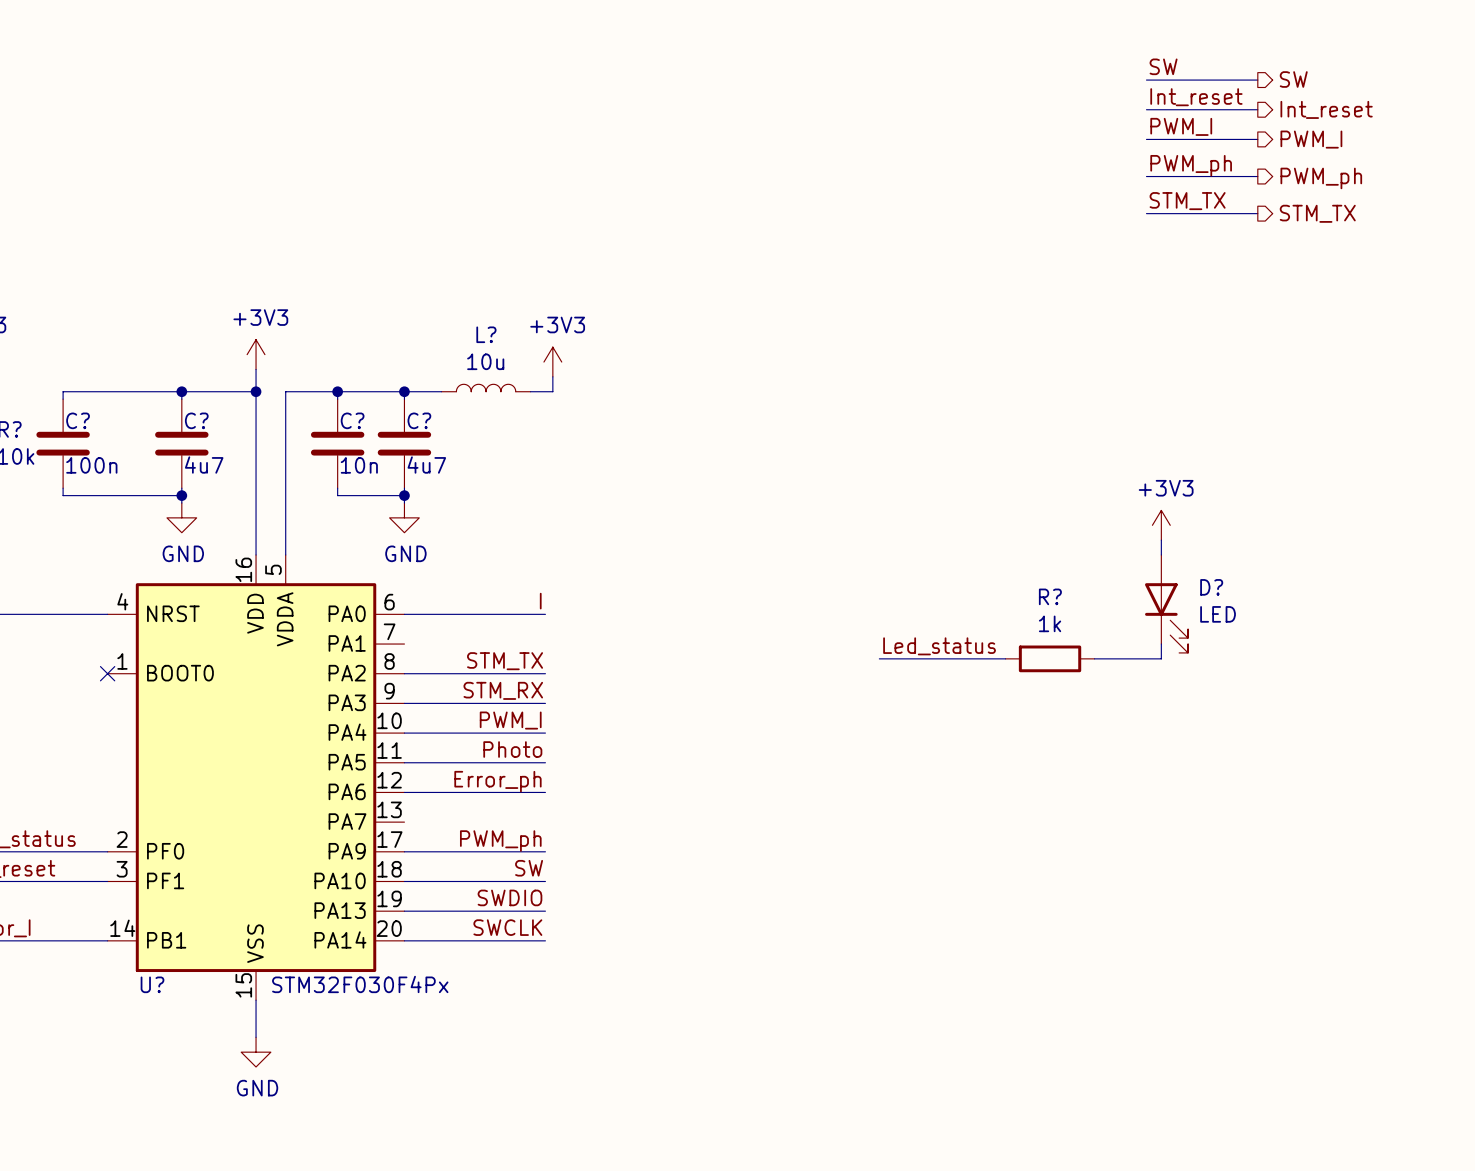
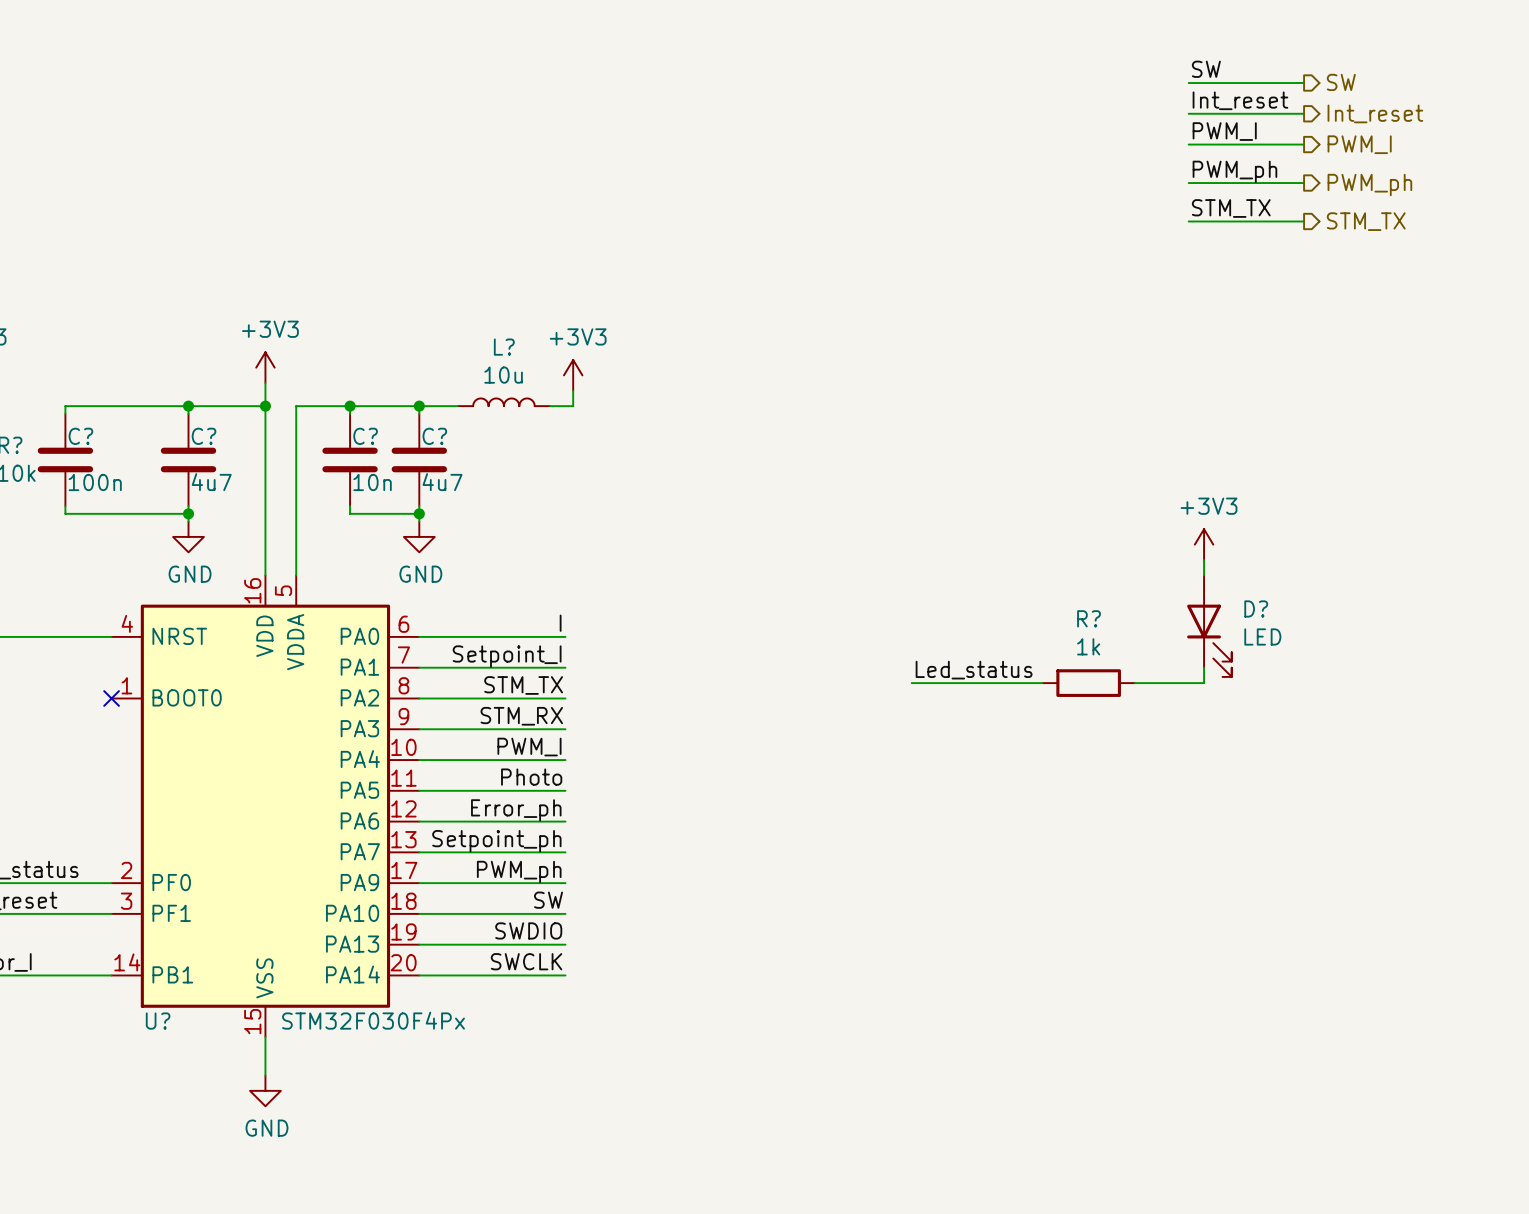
label: none -> Setpoint_I (507, 656)
wire: none -> (419, 667) (565, 667)
label: none -> Setpoint_ph (496, 841)
wire: none -> (419, 852) (565, 852)

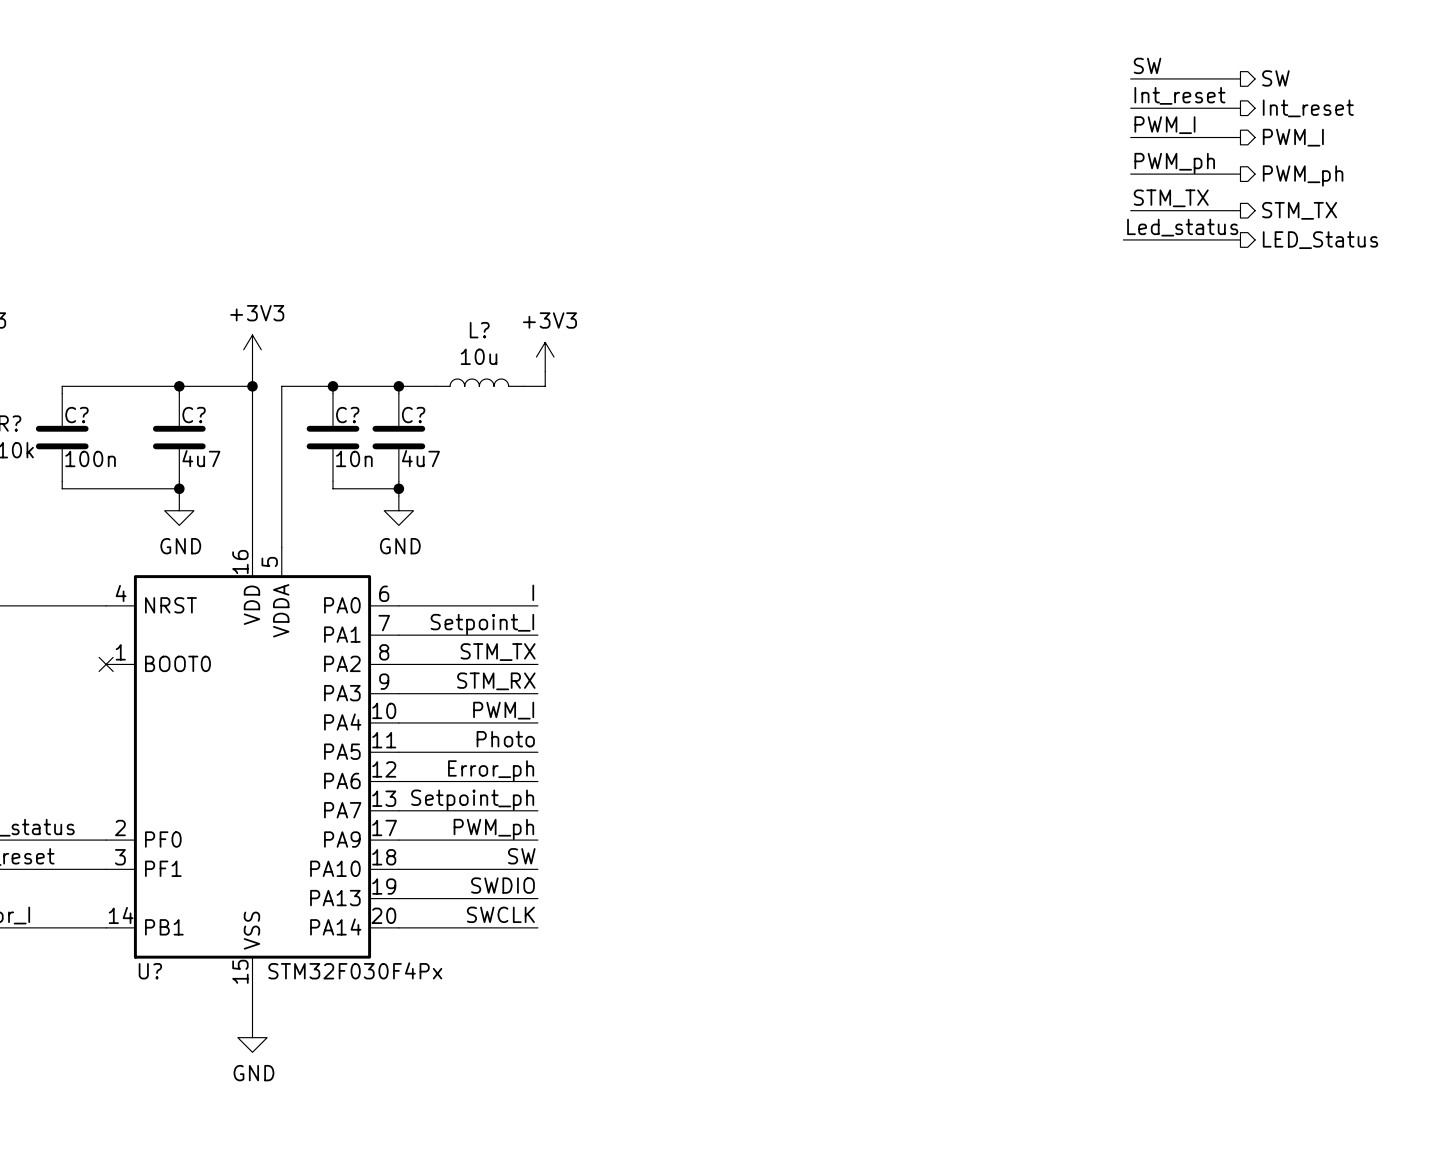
label: none -> Led_status (1182, 227)
wire: none -> (1123, 239) (1240, 239)
hierarchical label: none -> LED_Status (1320, 240)
power symbol: +3V3 (1204, 544) -> none
wire: (1204, 560) (1204, 575) -> none
D?: LED (1209, 626) -> none
wire: (1204, 667) (1204, 683) (1134, 683) -> none
label: Led_status (974, 670) -> none
wire: (911, 683) (1042, 683) -> none
R?: 1k (1088, 683) -> none

